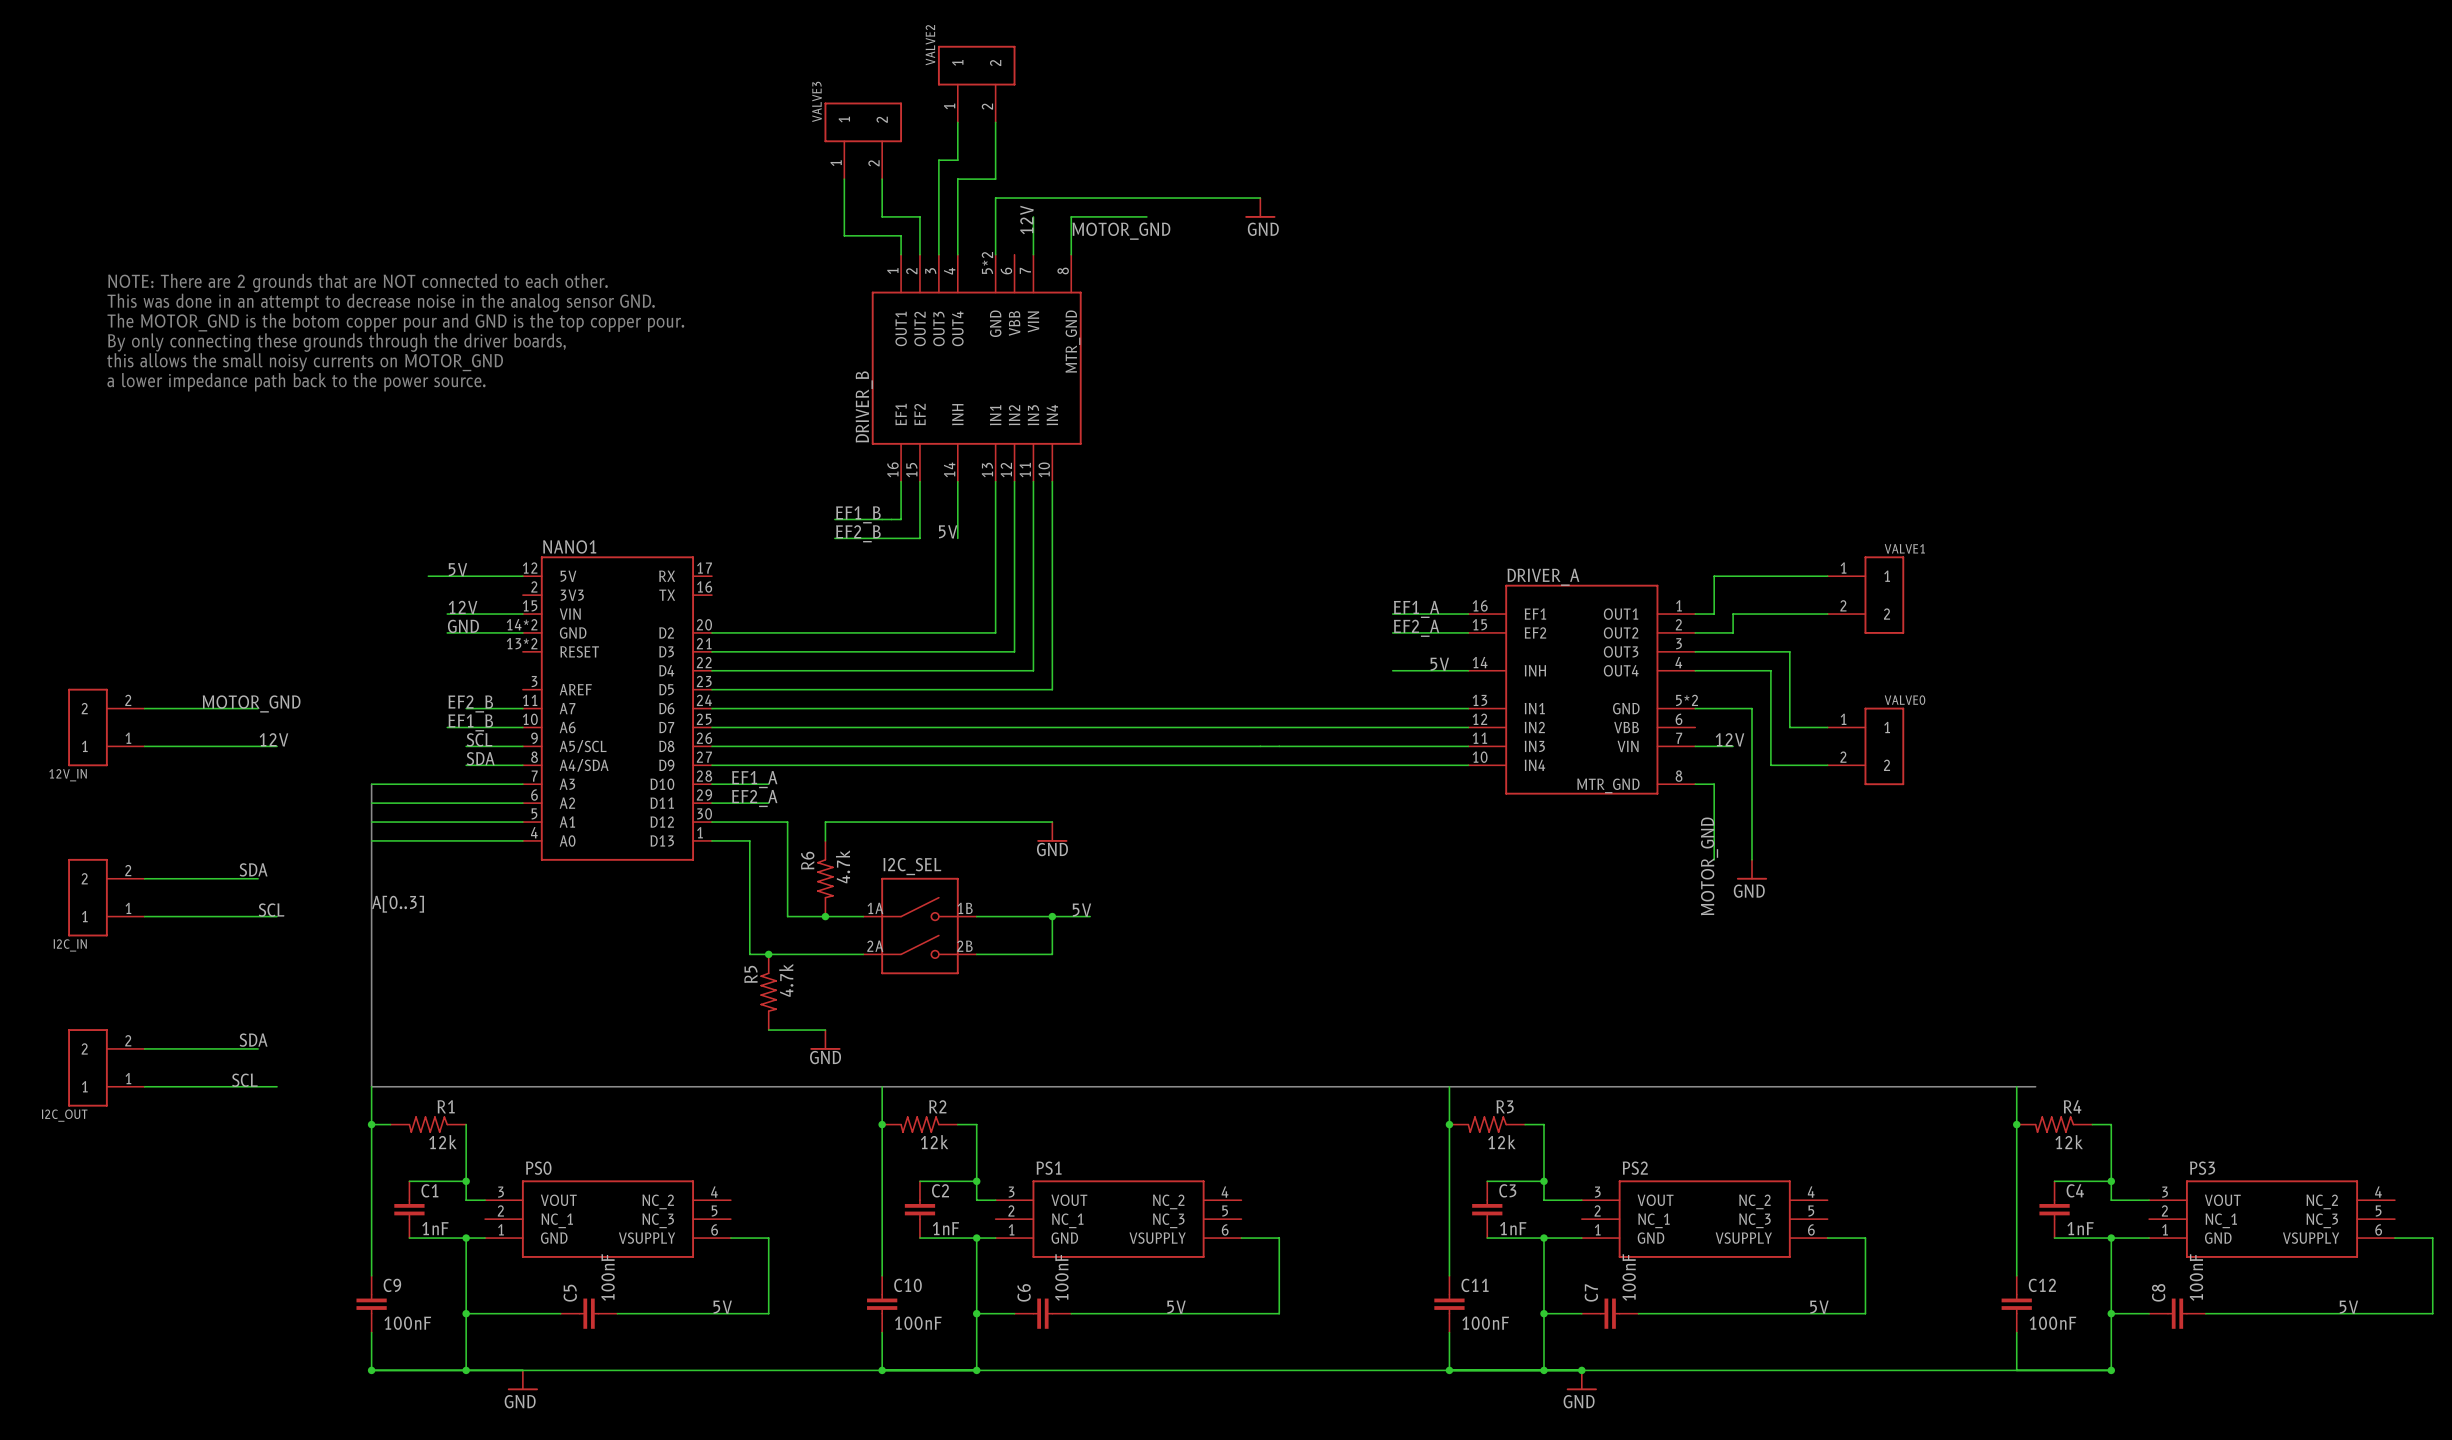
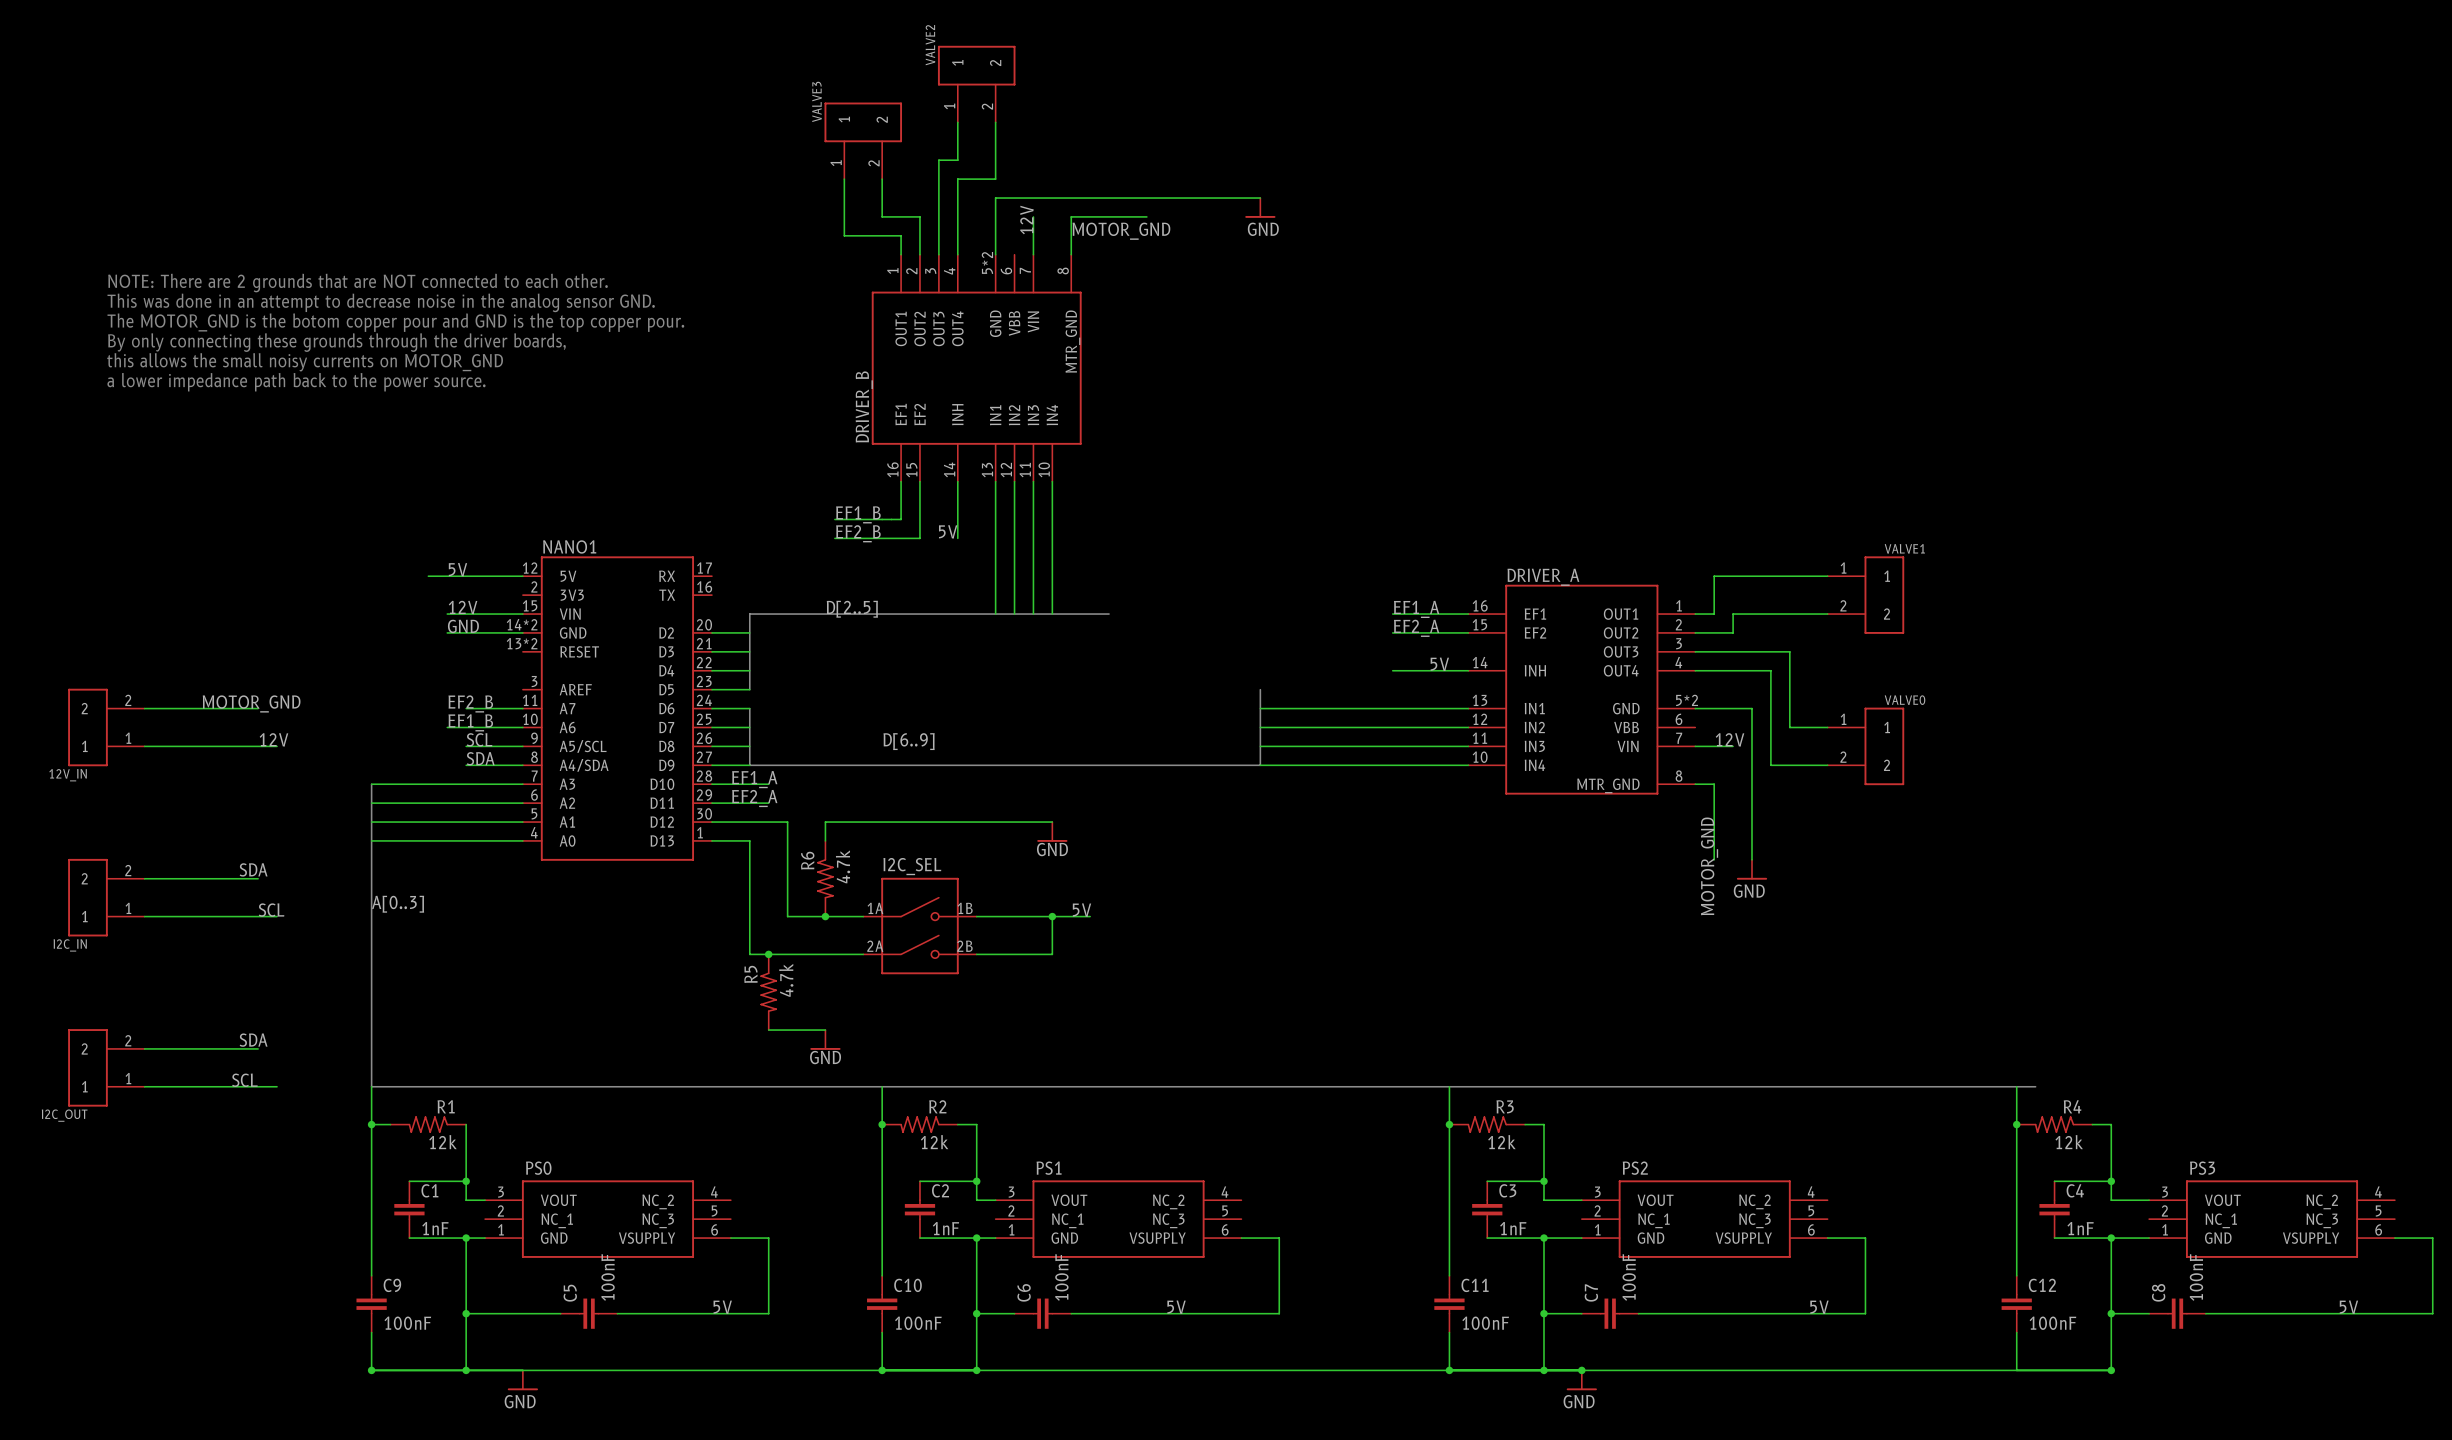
label: none -> D[2..5] (852, 609)
wire: (995, 614) (995, 632) (749, 632) -> none
wire: (1014, 614) (1014, 651) (749, 651) -> none
wire: (1033, 614) (1033, 670) (749, 670) -> none
wire: (1052, 614) (1052, 689) (749, 689) -> none
bus: none -> (1109, 614) (749, 614) (749, 689)
bus: none -> (1260, 689) (1260, 765) (749, 765) (749, 708)
wire: (749, 708) (1260, 708) -> none
wire: (749, 727) (1260, 727) -> none
label: none -> D[6..9] (909, 741)
wire: (749, 746) (1260, 746) -> none

